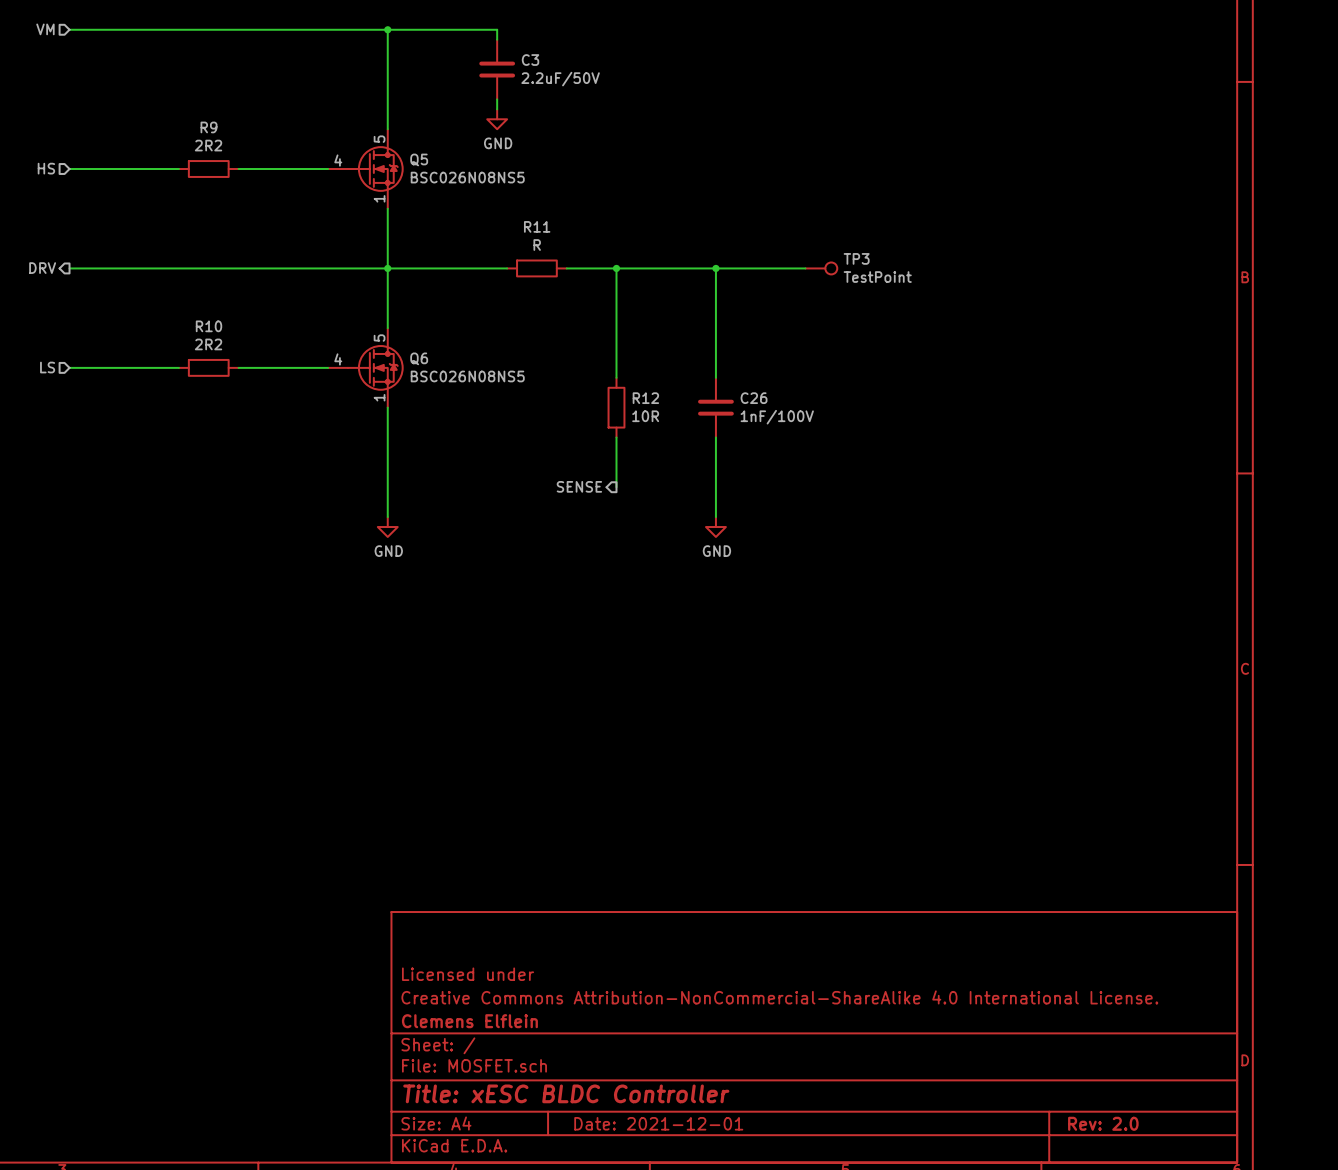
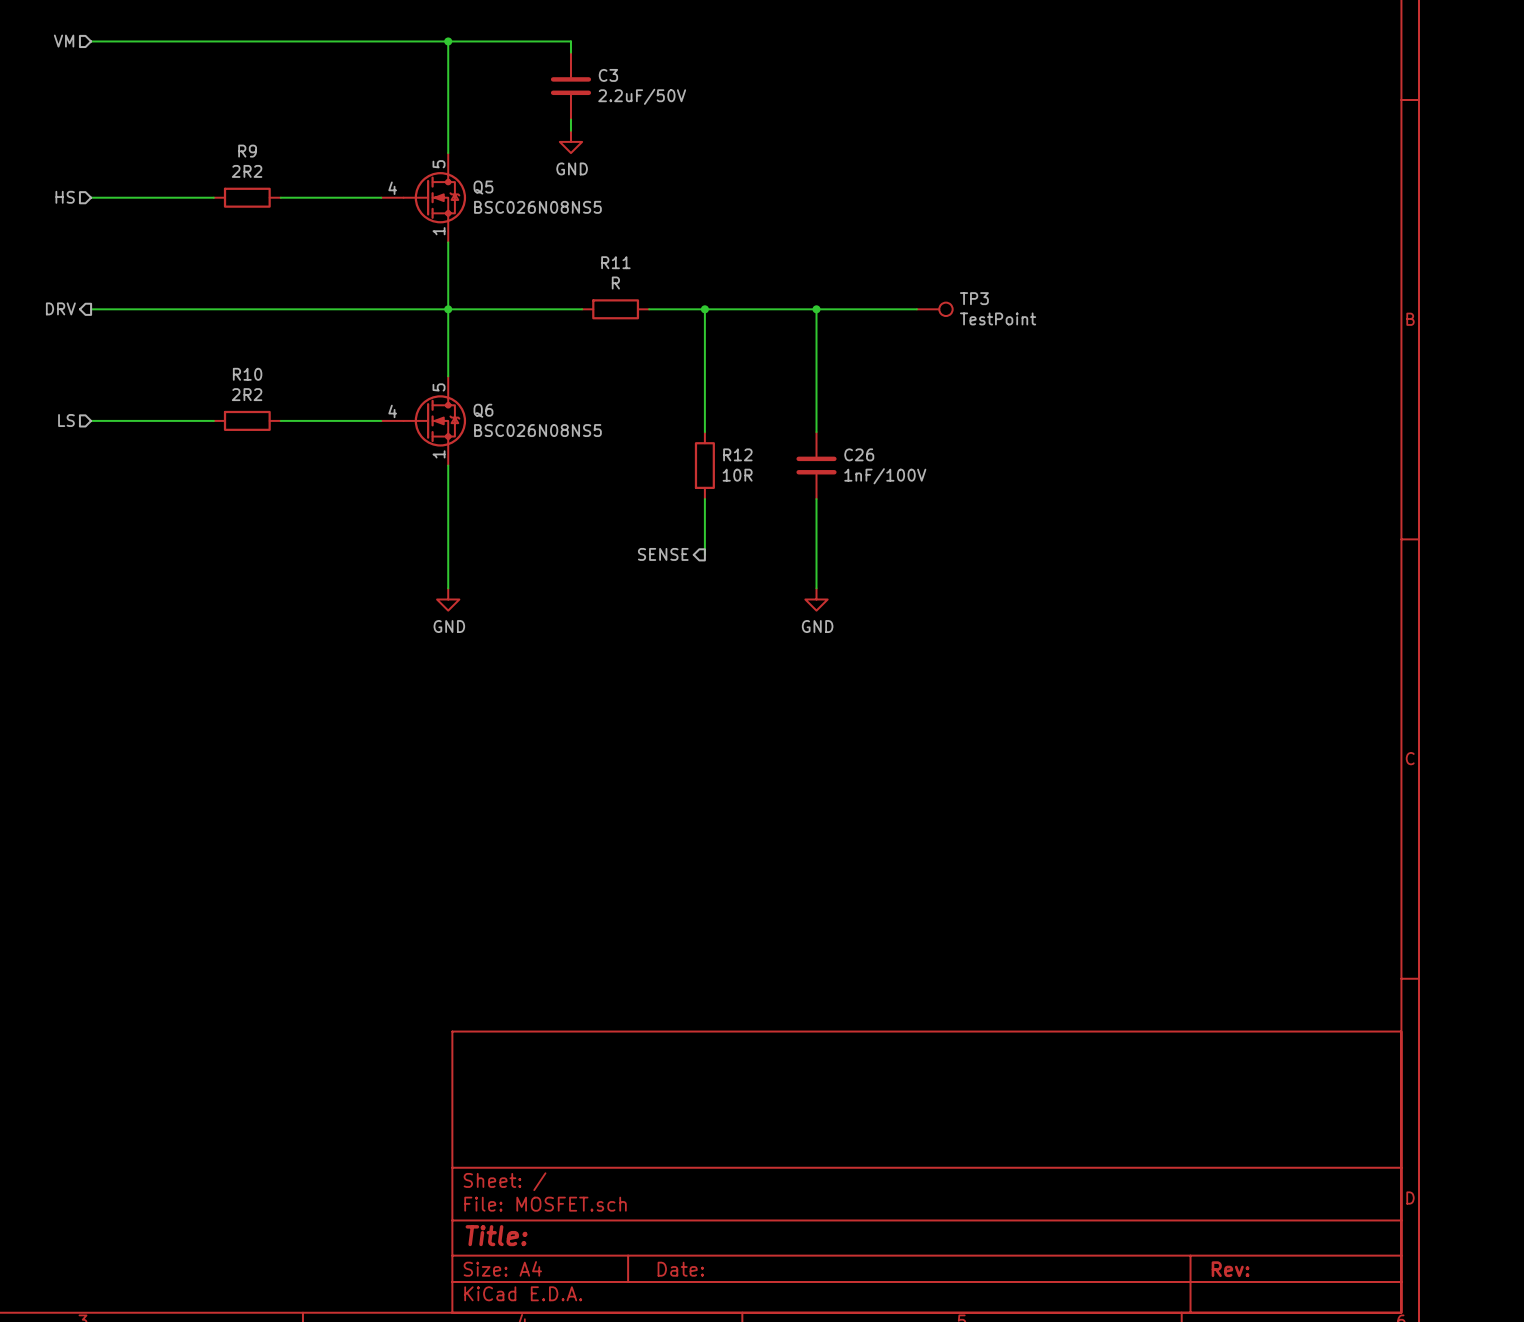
title block: Licensed under (468, 974) -> none
title block: Creative Commons Attribution-NonCommercial-ShareAlike 4.0 International License. (779, 997) -> none
title block: Clemens Elflein (469, 1021) -> none
title block: Title: xESC BLDC Controller (566, 1093) -> Title: (496, 1235)
title block: Date: 2021-12-01 (658, 1123) -> Date: (680, 1269)
title block: Rev: 2.0 (1103, 1123) -> Rev: (1230, 1269)

